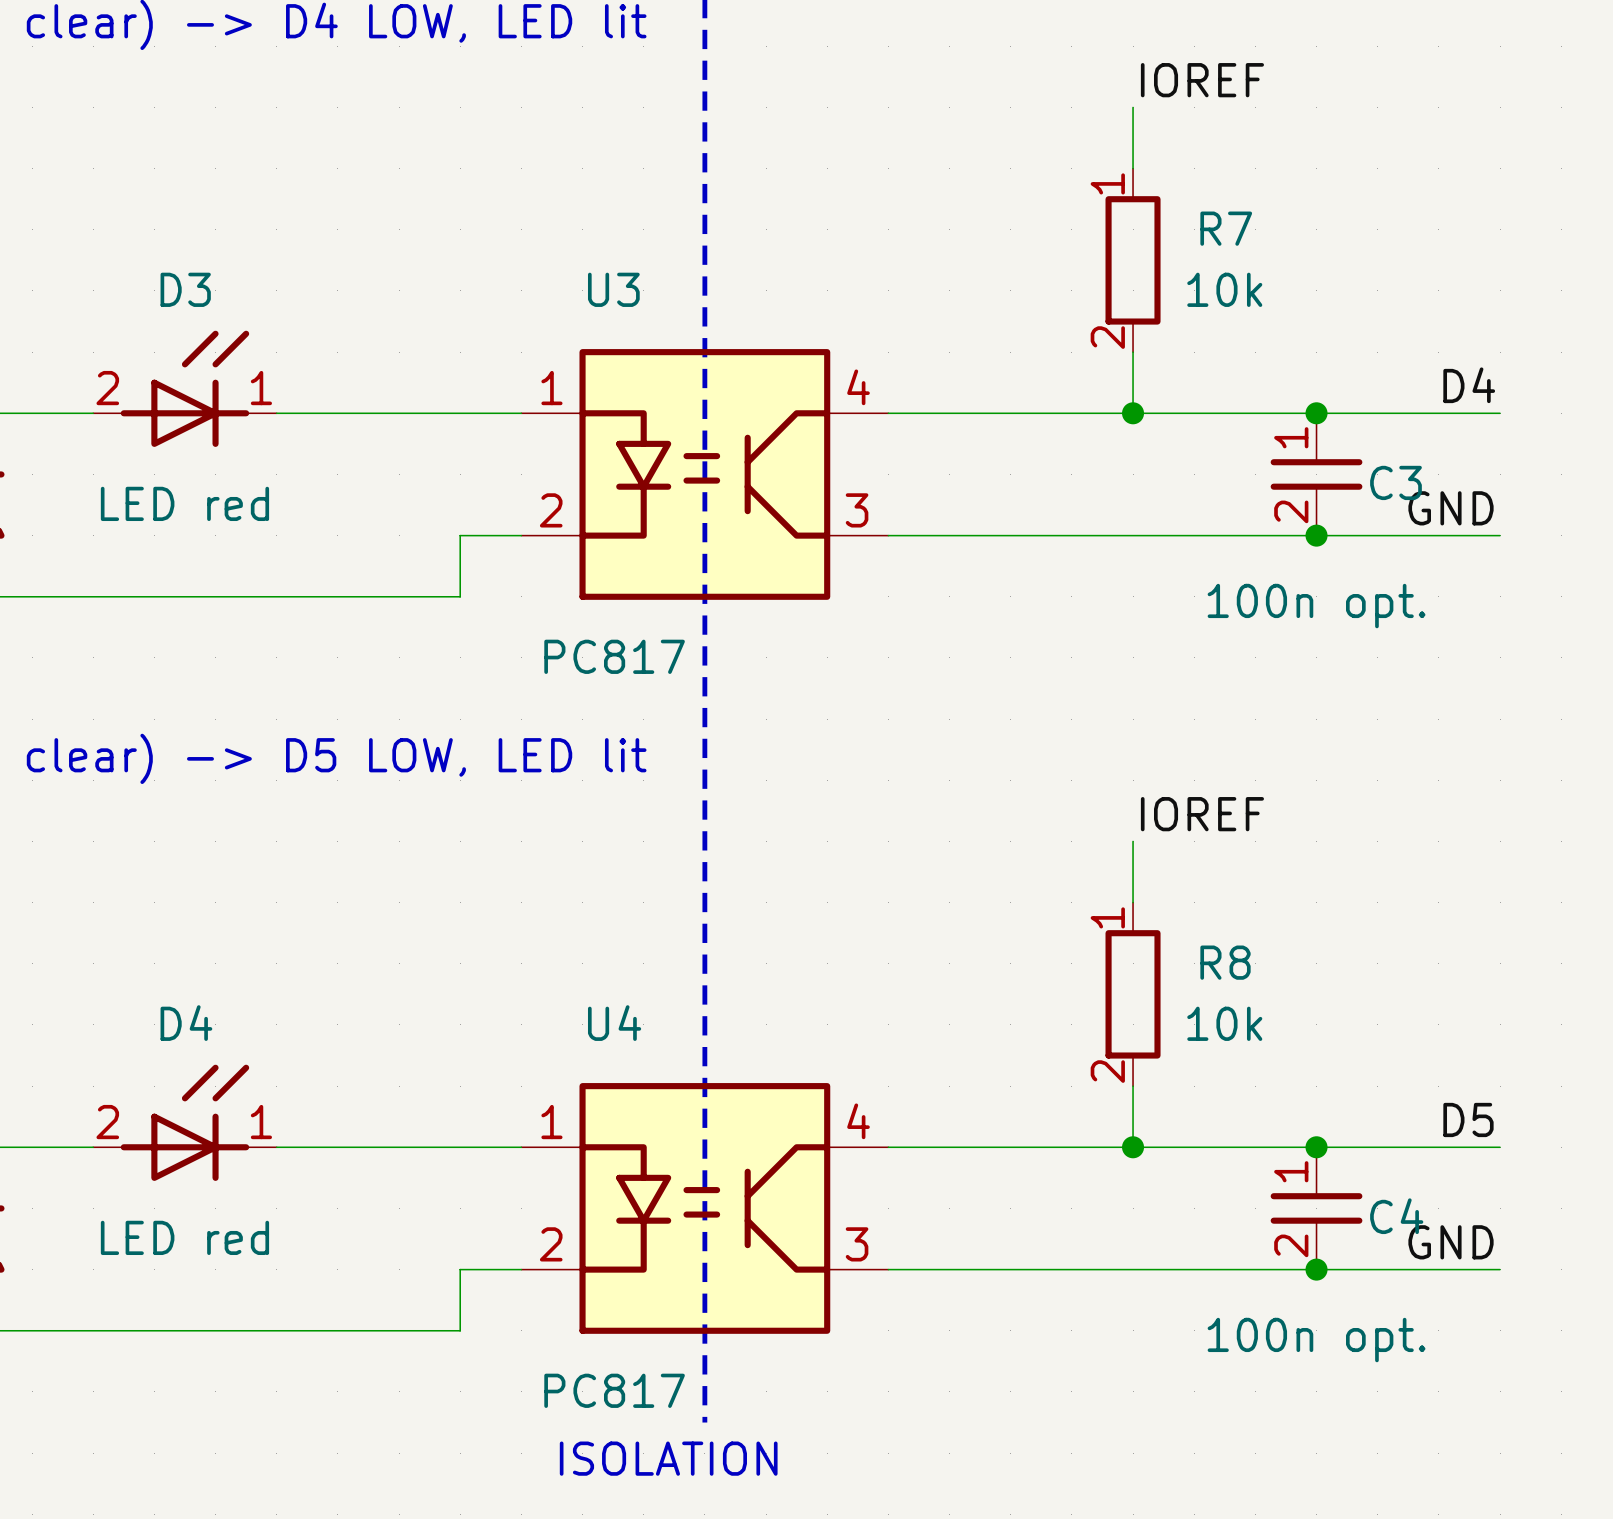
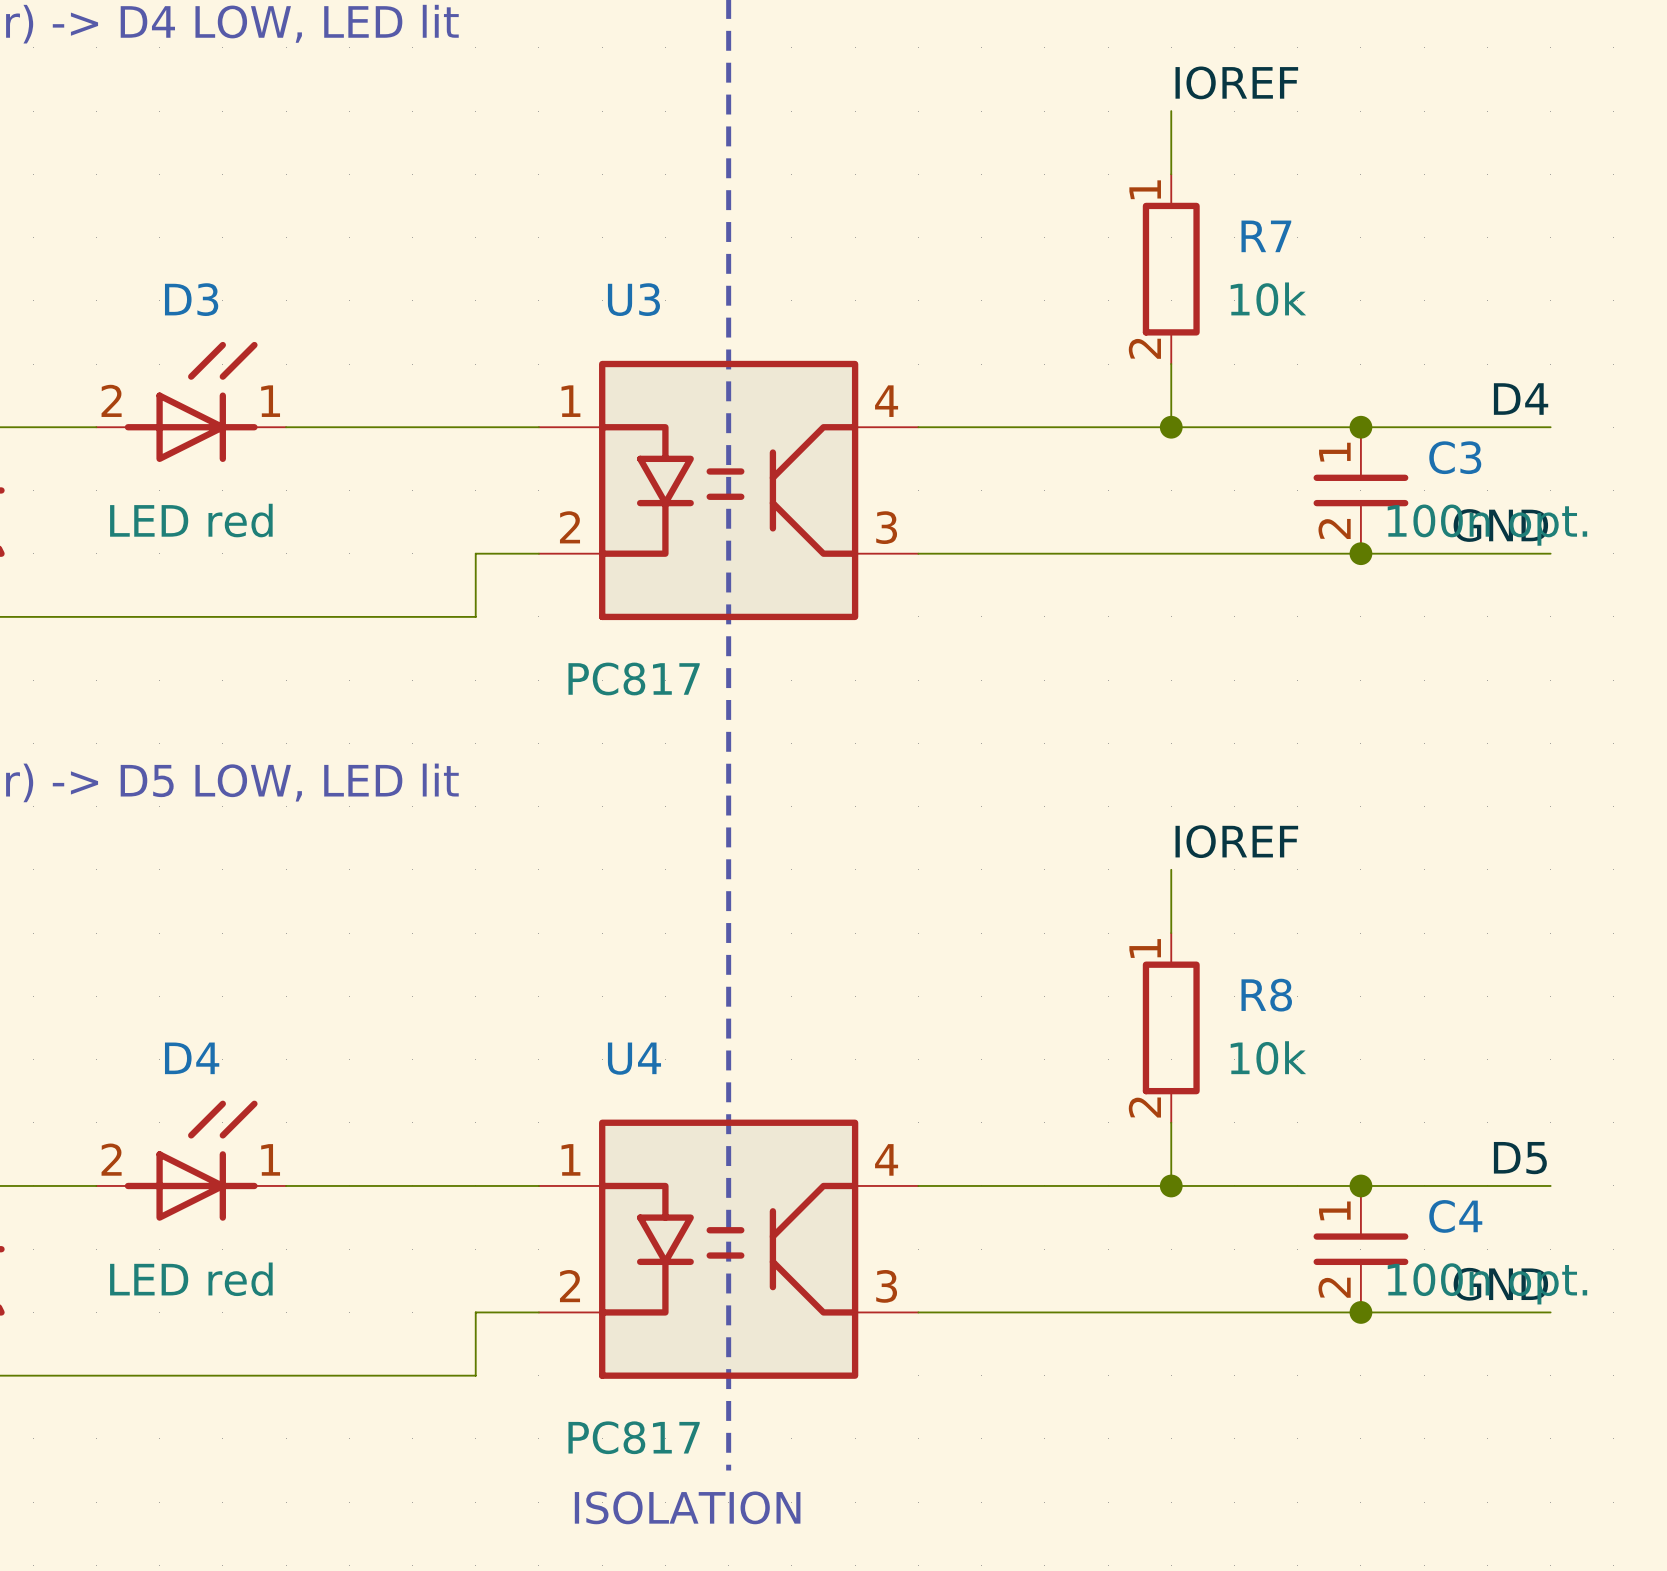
C3 name position: C3 (1395, 482) -> C3 (1455, 457)
C3 value position: 100n opt. (1316, 606) -> 100n opt. (1487, 525)
C4 name position: C4 (1396, 1216) -> C4 (1455, 1216)
C4 value position: 100n opt. (1316, 1340) -> 100n opt. (1487, 1283)

